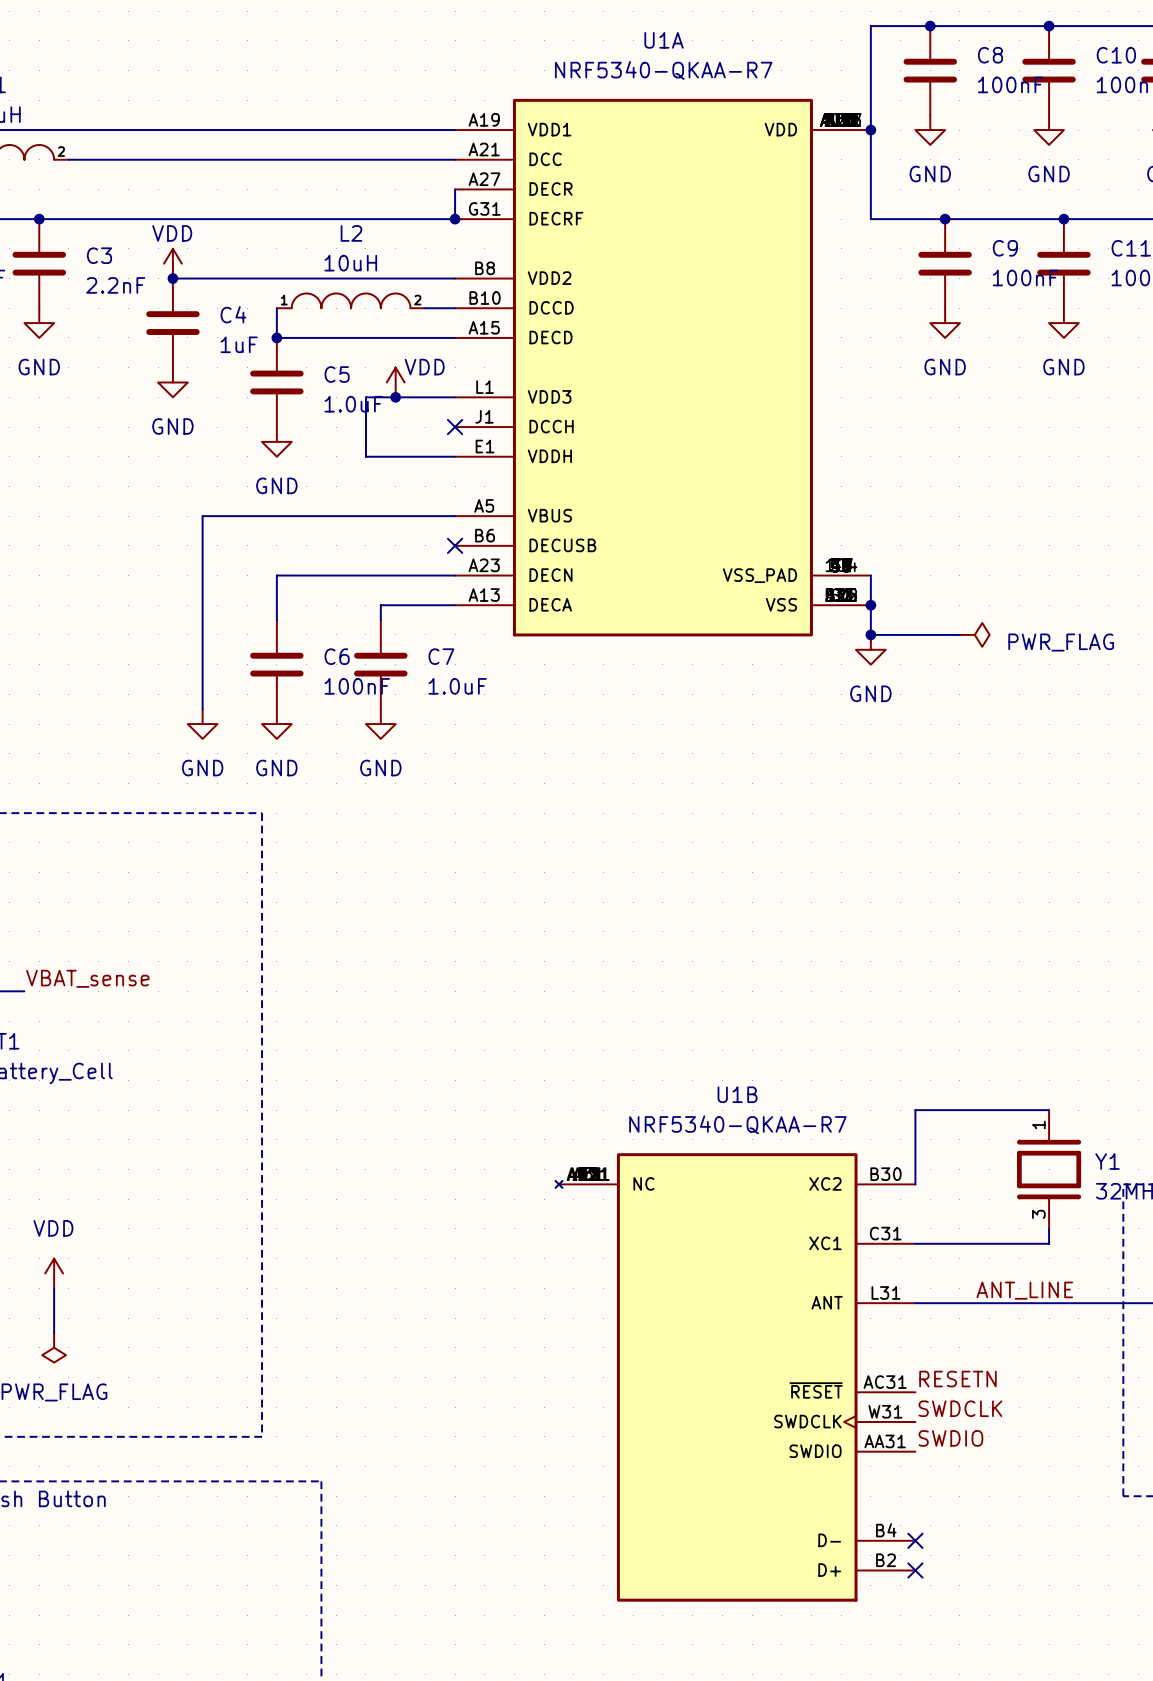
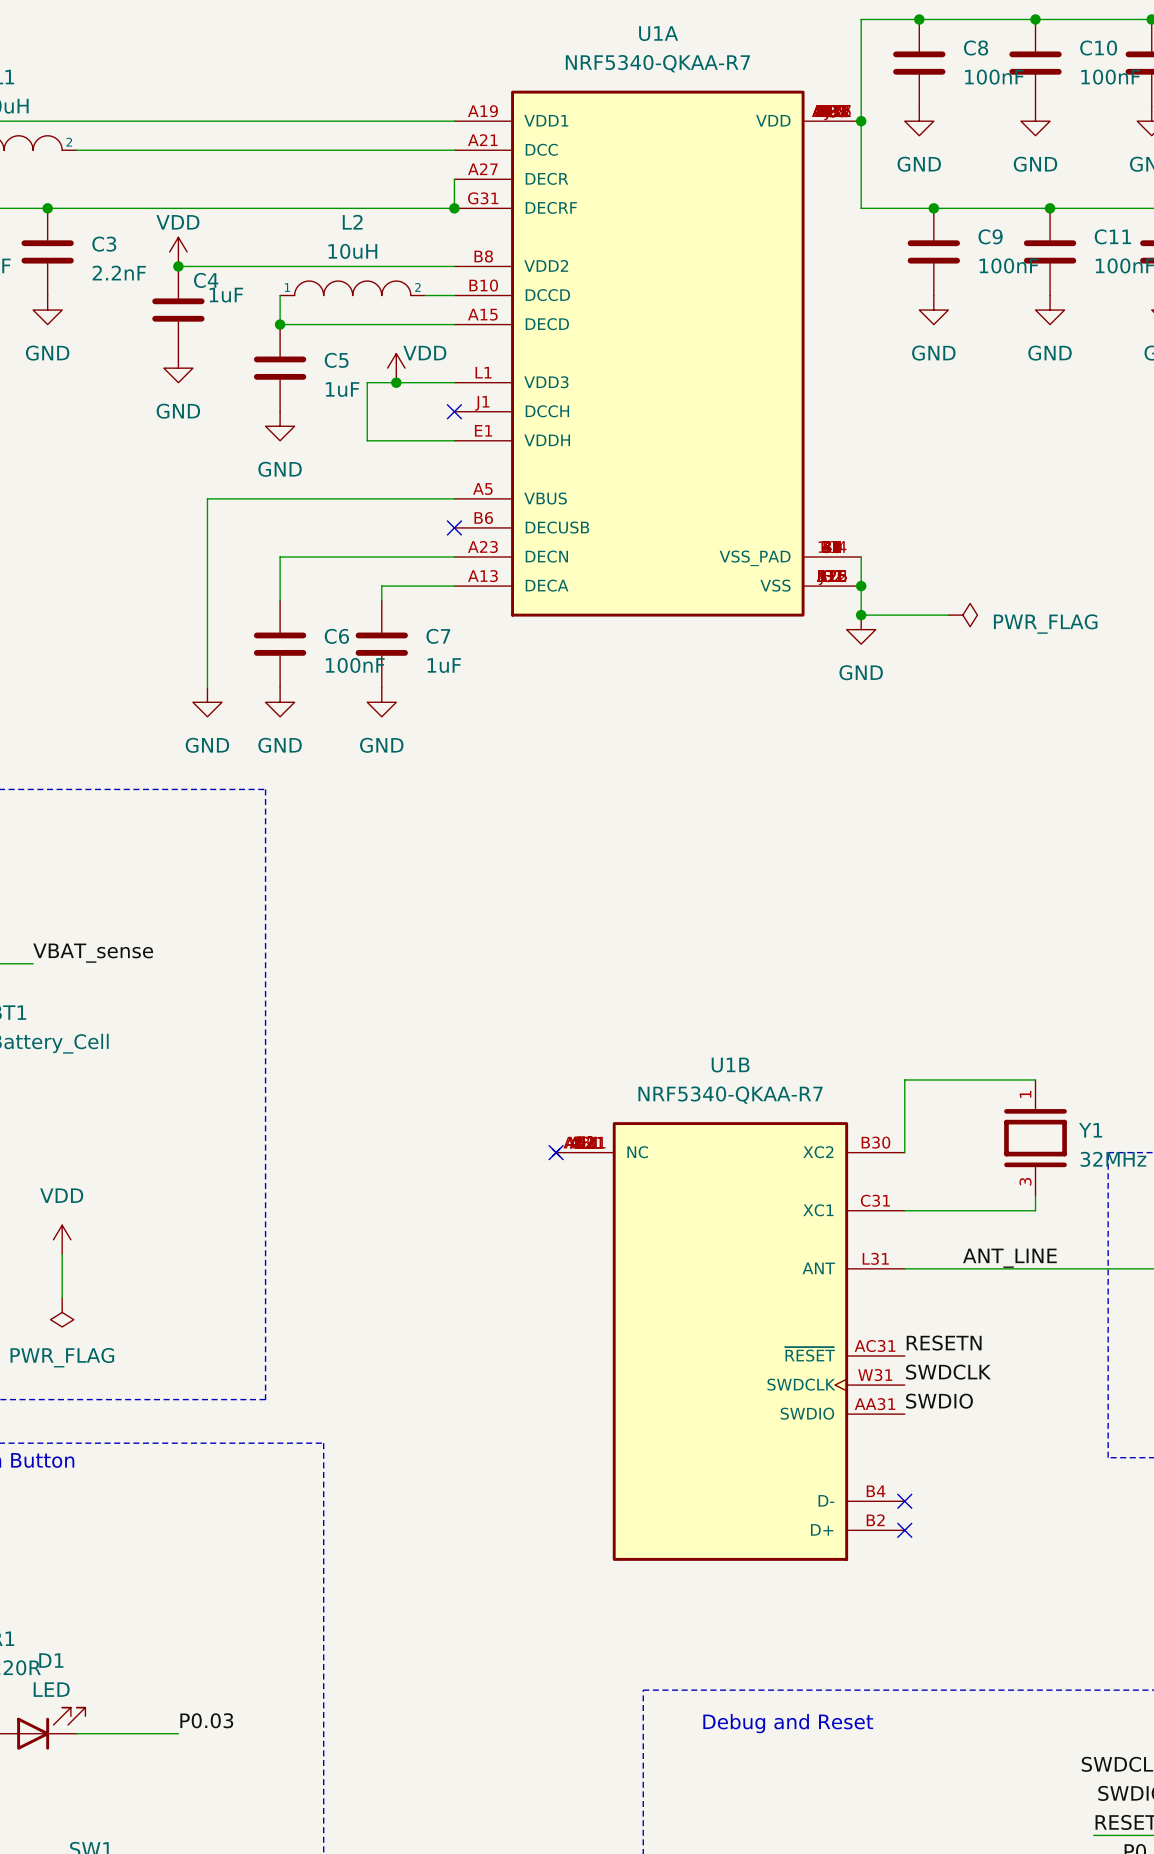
C4 name position: C4 (233, 314) -> C4 (206, 280)
C4 value position: 1uF (239, 344) -> 1uF (226, 295)
C5 value: 1.0uF (353, 404) -> 1uF (342, 389)
C7 value: 1.0uF (457, 686) -> 1uF (444, 665)
no-connect mark: none -> (556, 1152)

